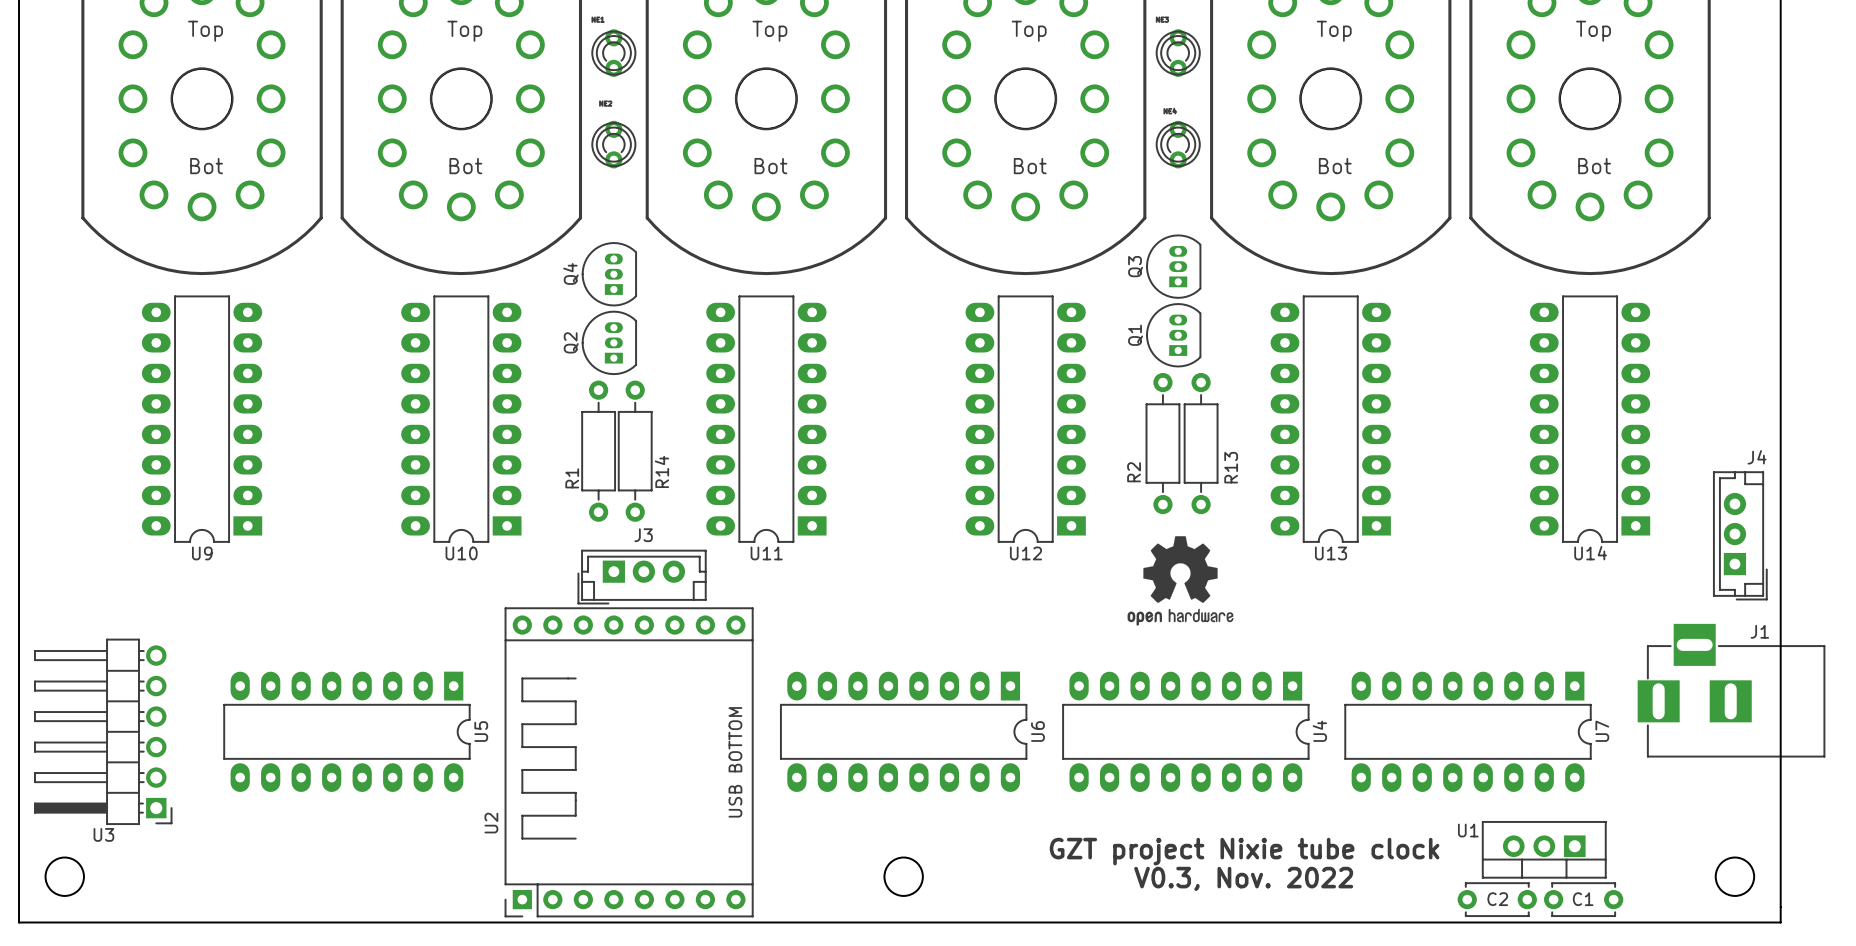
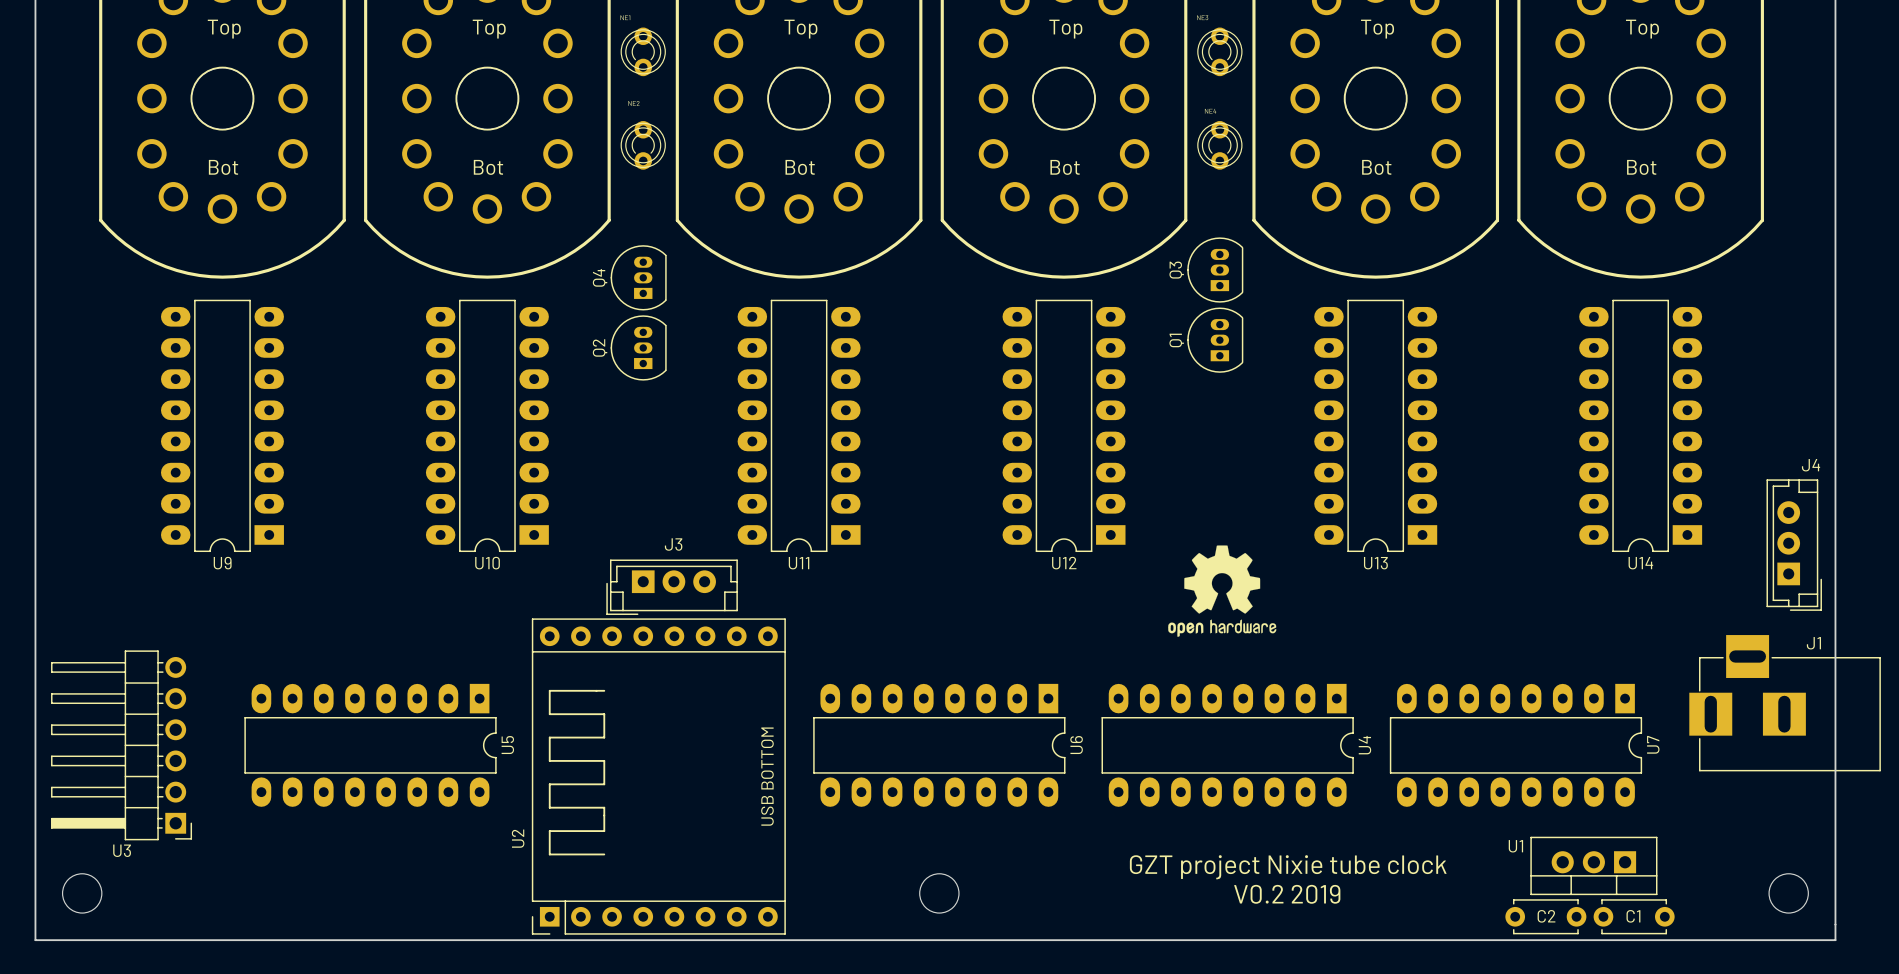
R2: (1162, 443) -> none
R13: (1201, 443) -> none
R1: (598, 451) -> none
R14: (635, 451) -> none
text: V0.3, Nov. 2022 (1243, 878) -> V0.2 2019 (1287, 894)

